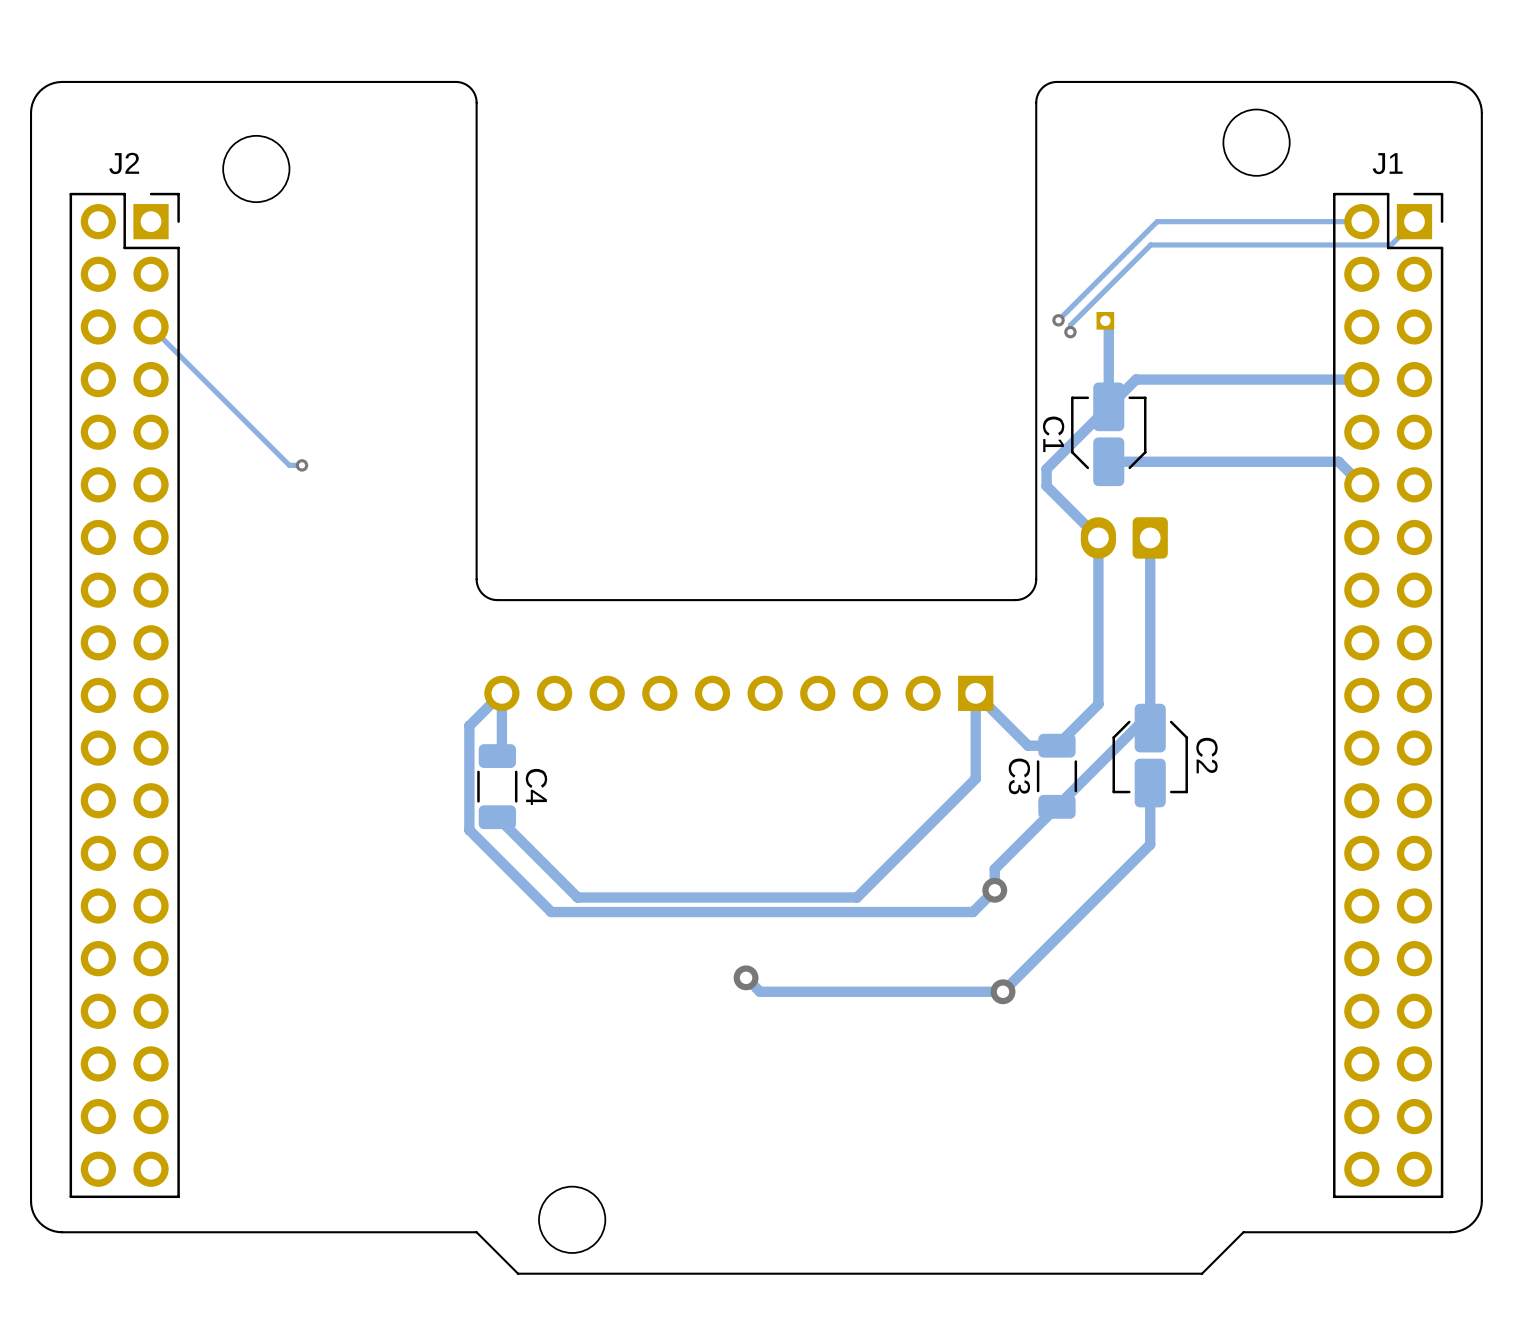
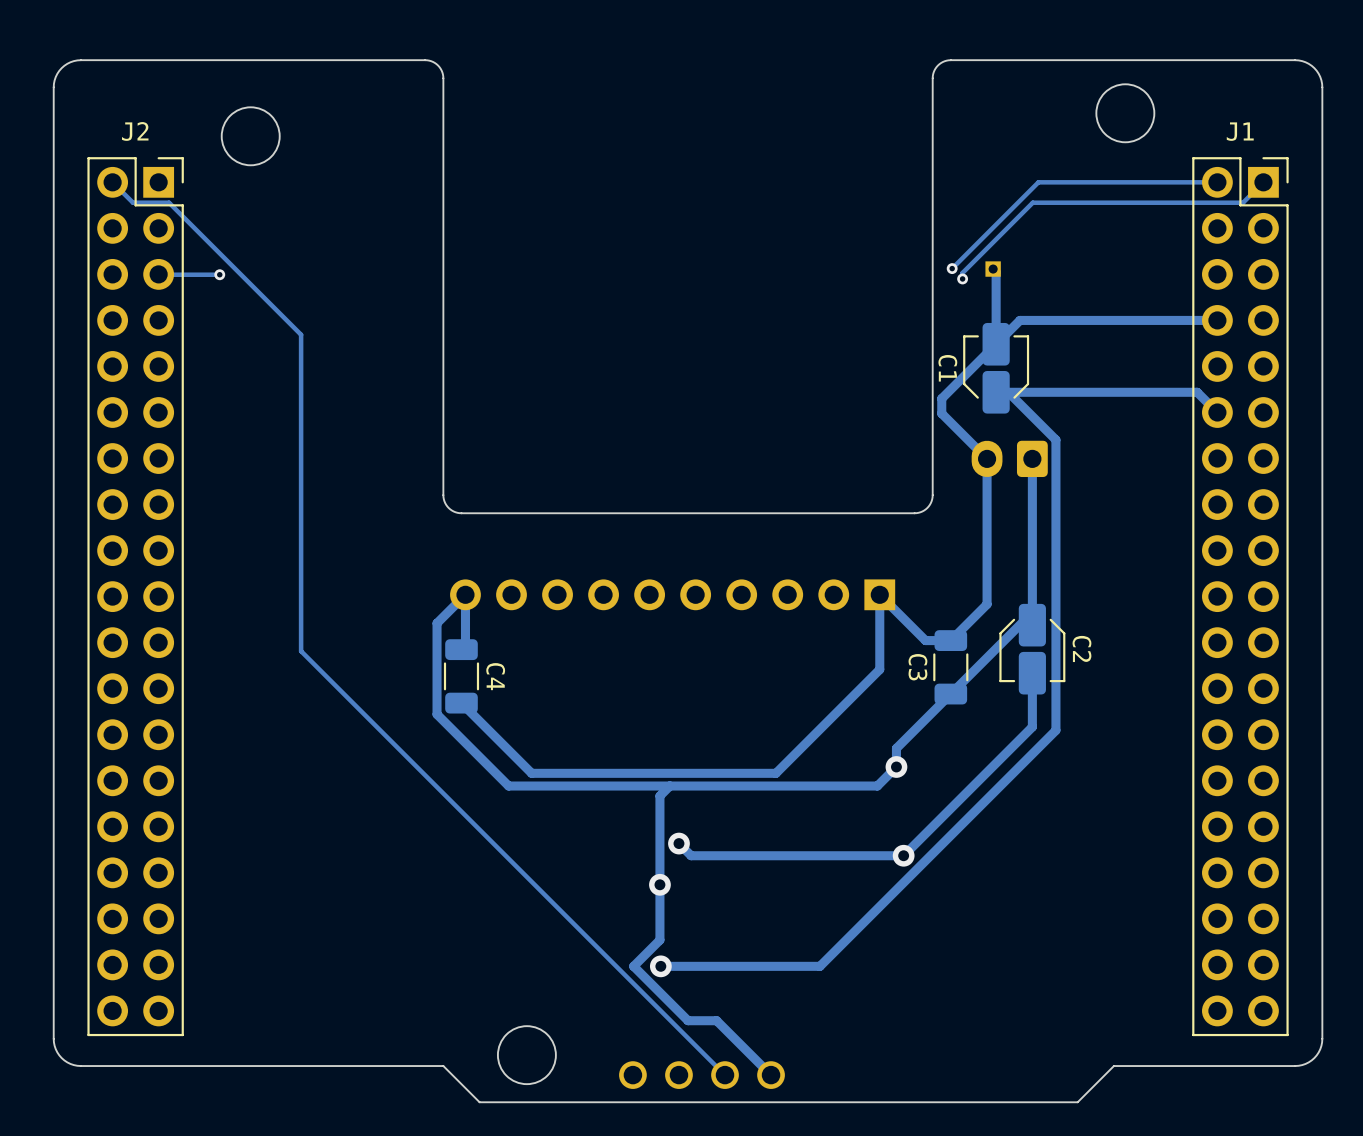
track: none -> (112, 182) (133, 202) (169, 202) (301, 334) (301, 651) (725, 1075)
track: (151, 327) (289, 465) (302, 465) -> (158, 274) (219, 274)
via: none -> (219, 274)
track: none -> (1008, 392) (1055, 439) (1055, 730) (819, 966) (660, 966)
via: (302, 465) -> none
track: none -> (669, 786) (659, 795) (659, 940) (633, 966) (688, 1020) (716, 1020) (771, 1075)
via: none -> (659, 884)
via: none -> (660, 966)
part: none -> (701, 1075)

